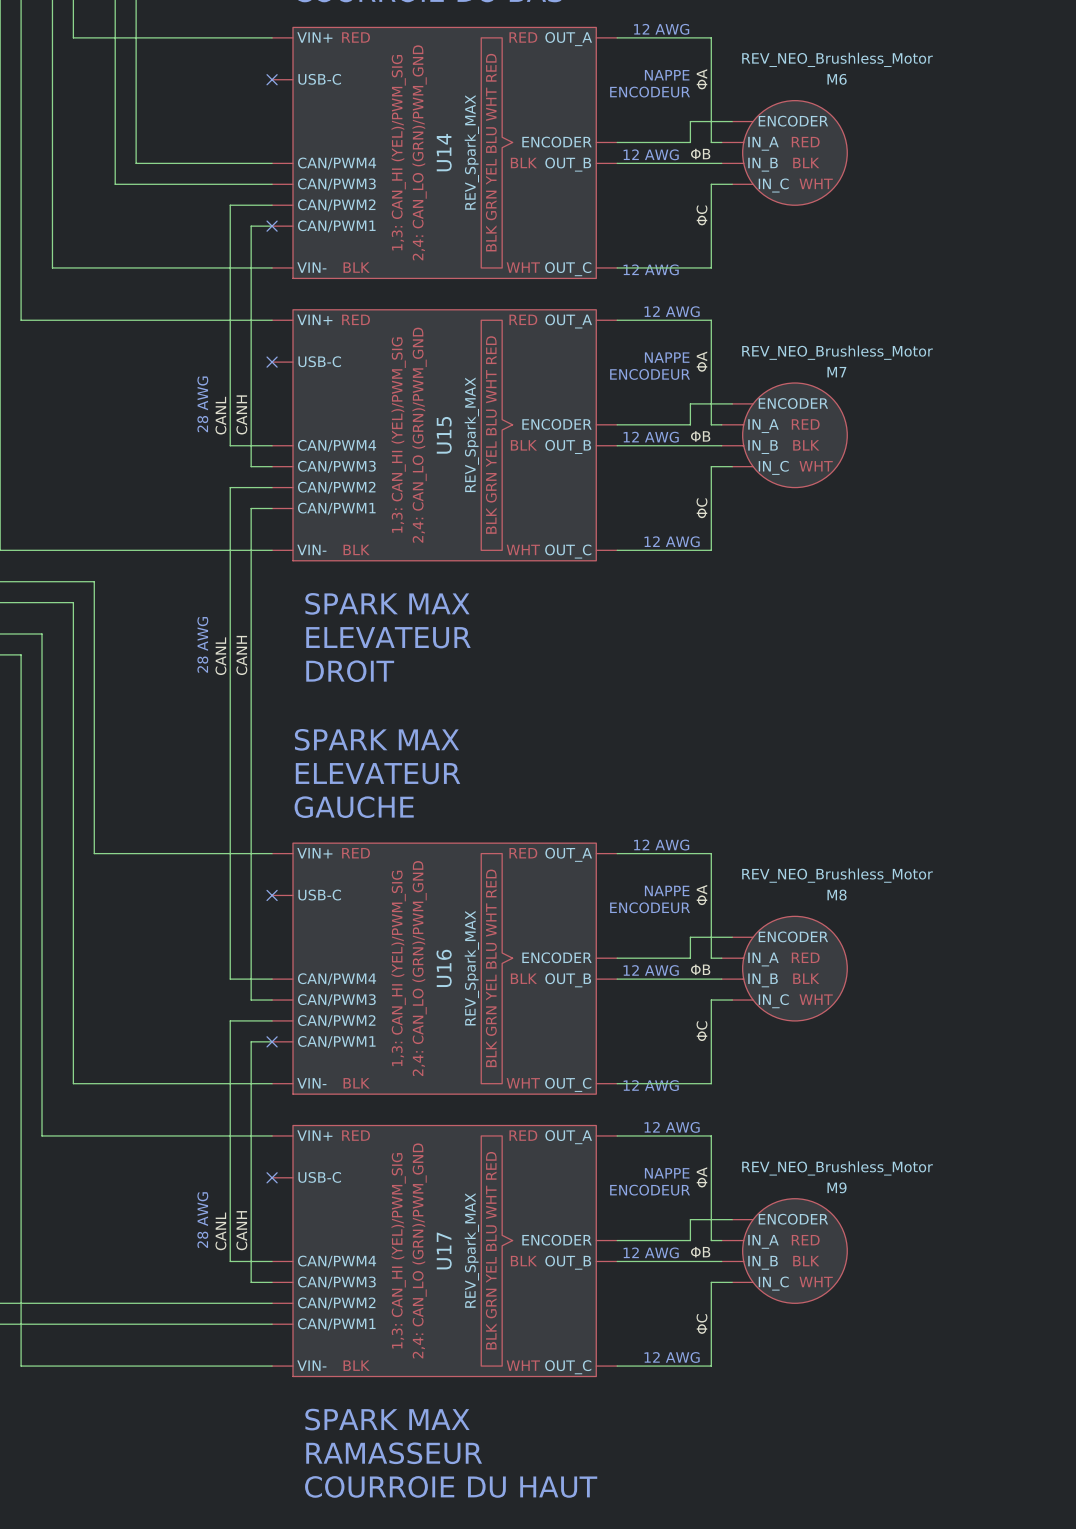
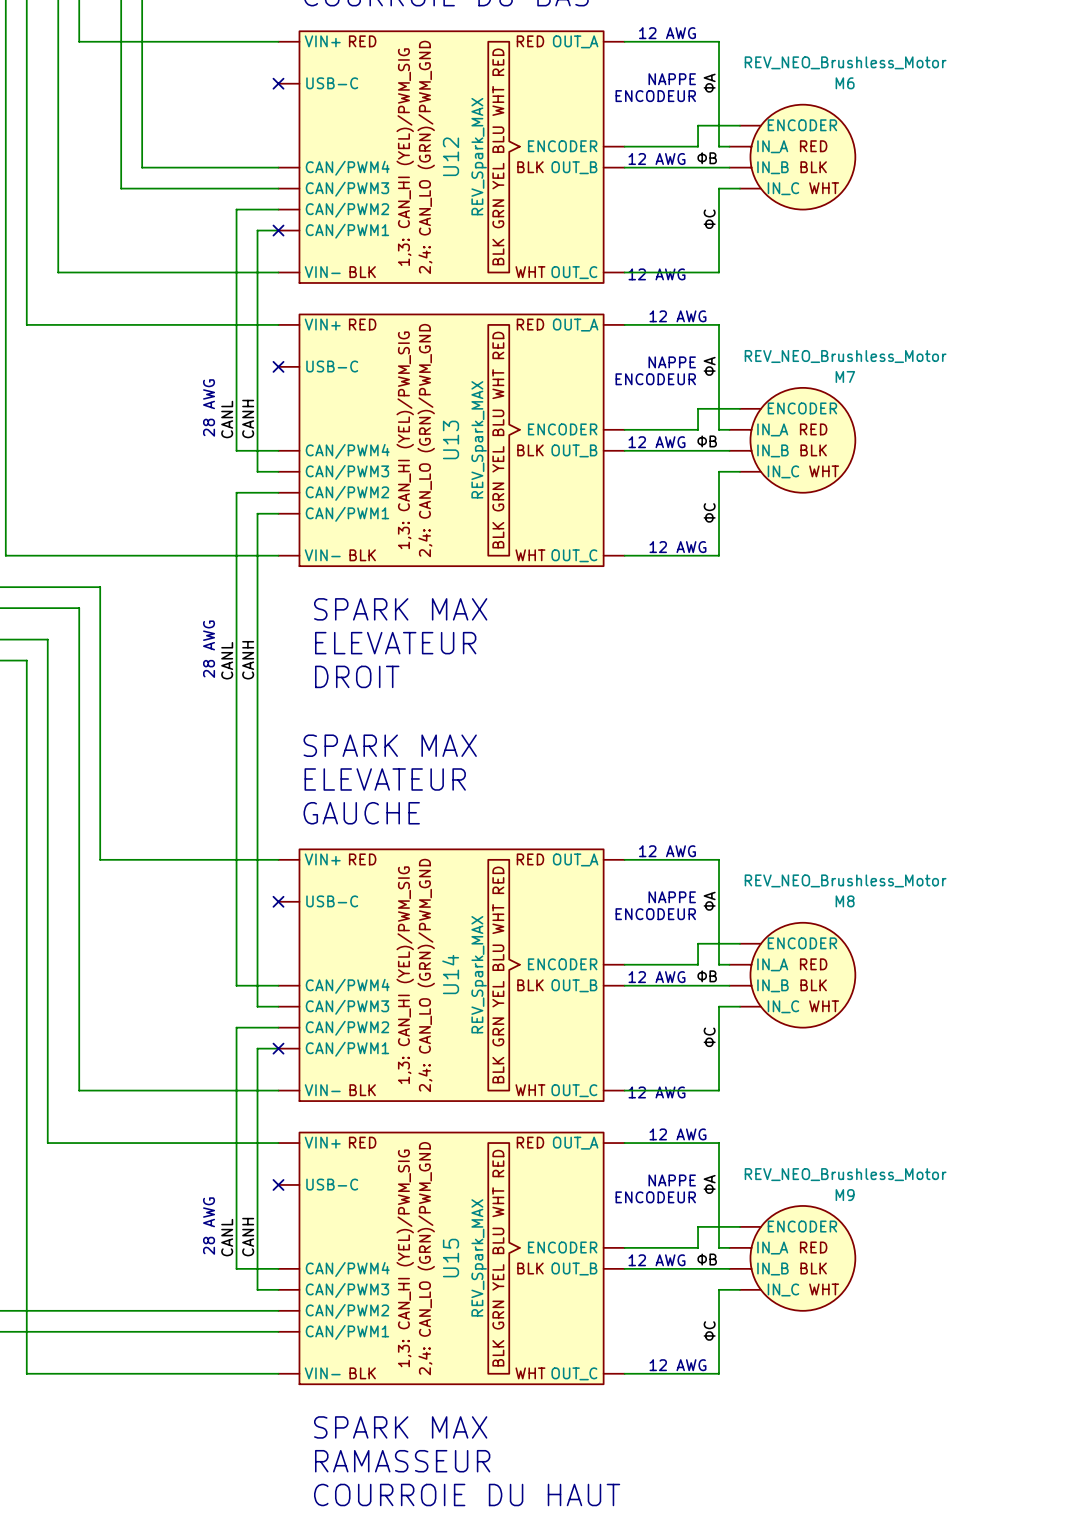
U14 name: U14 (444, 152) -> U12 (451, 156)
U15 name: U15 (444, 435) -> U13 (451, 439)
U16 name: U16 (444, 968) -> U14 (450, 974)
U17 name: U17 (444, 1250) -> U15 (451, 1258)

